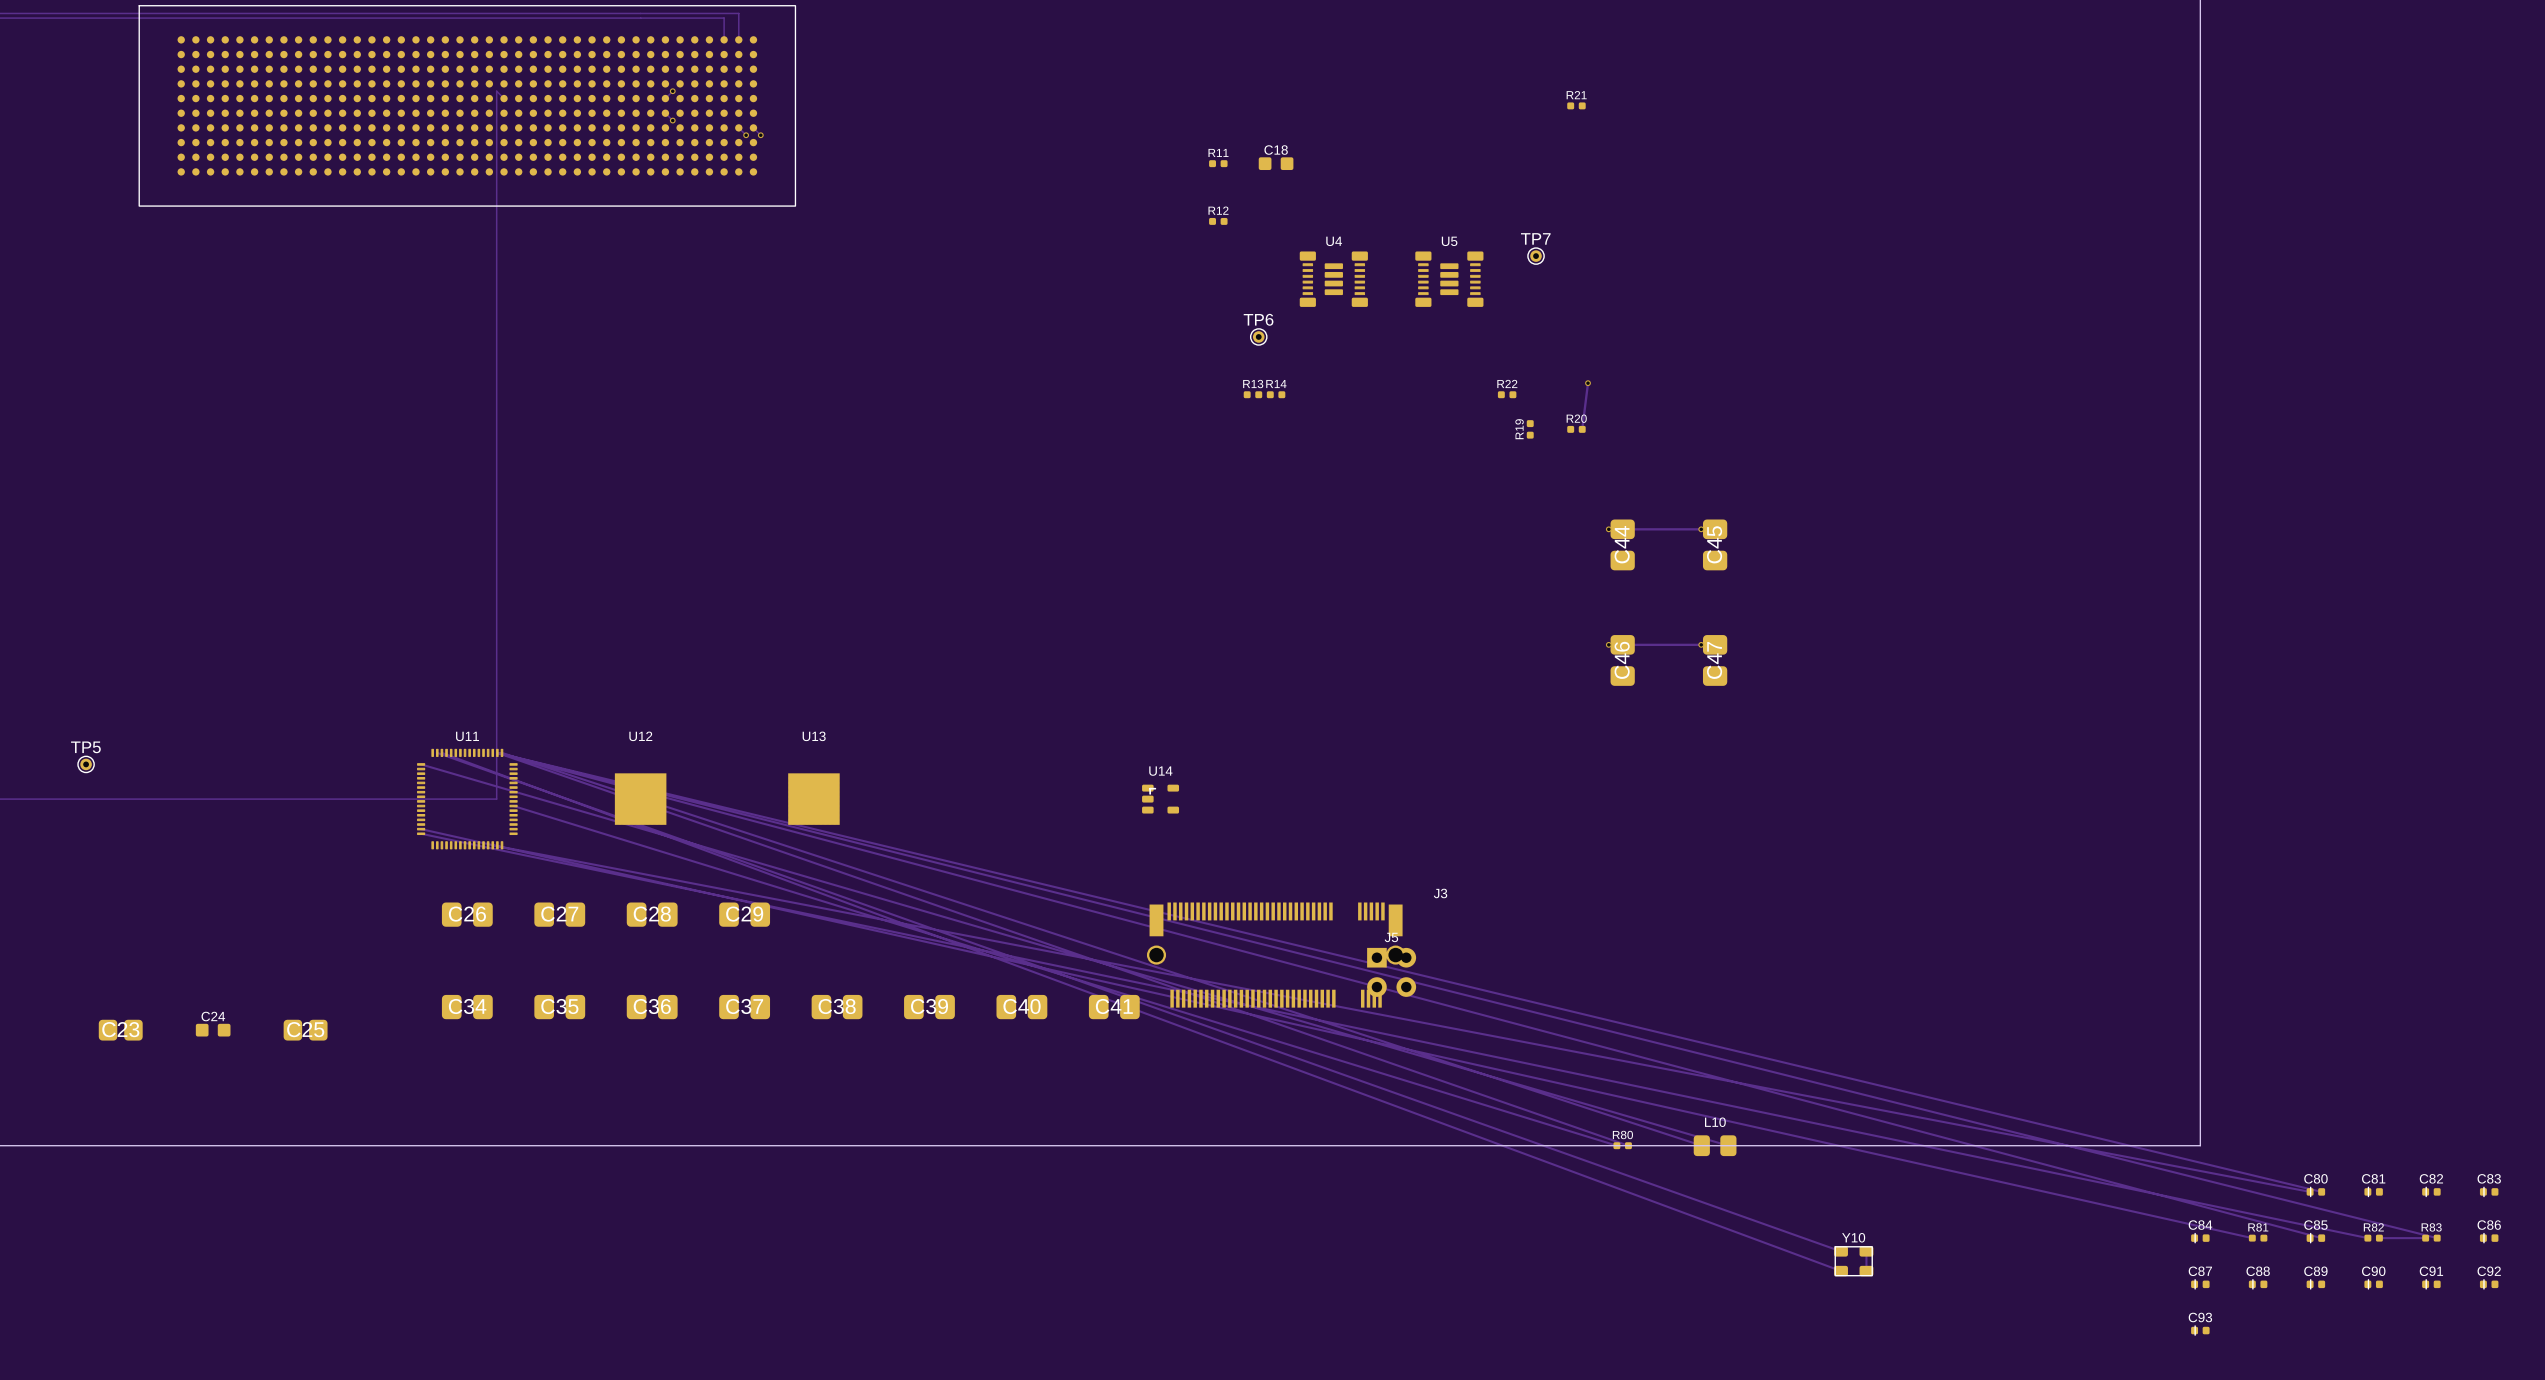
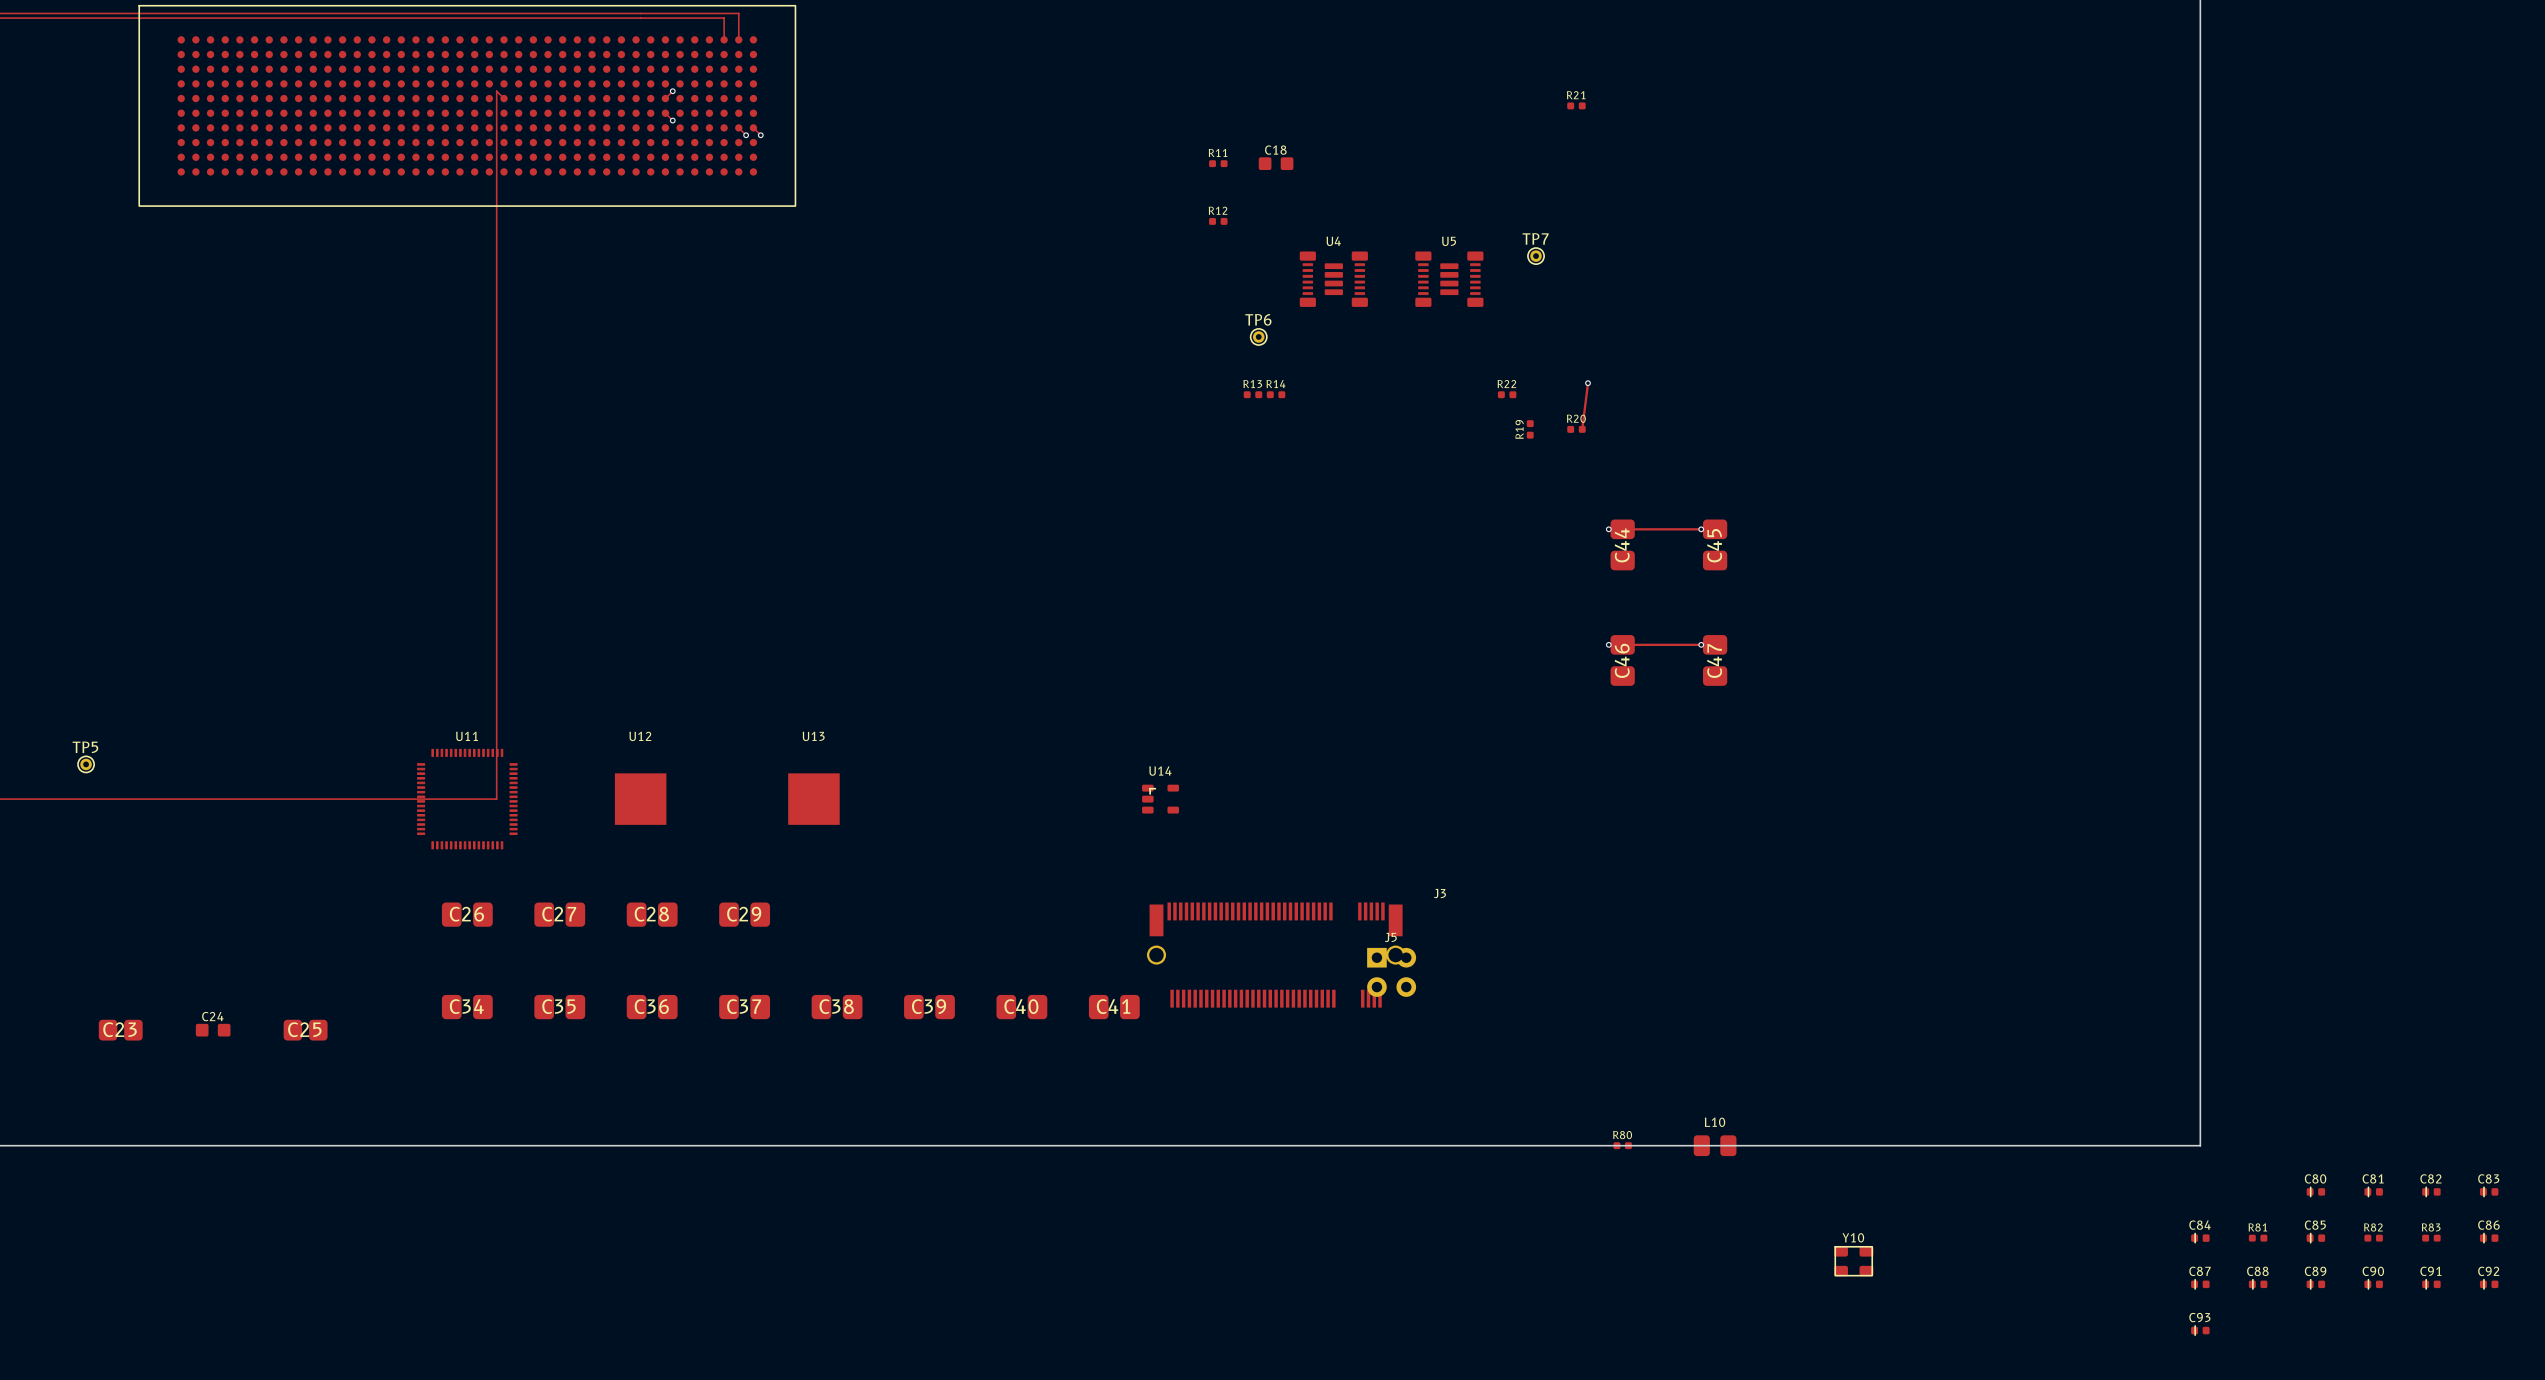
track: (437, 752) (1841, 1251) -> none
track: (441, 752) (1841, 1271) -> none
track: (497, 752) (2321, 1191) -> none
track: (497, 752) (2321, 1238) -> none
track: (497, 752) (2437, 1238) -> none
track: (497, 752) (1628, 1145) -> none
track: (502, 752) (1701, 1145) -> none
track: (421, 764) (1728, 1145) -> none
track: (513, 806) (1616, 1145) -> none
track: (421, 829) (2252, 1238) -> none
track: (421, 833) (2367, 1238) -> none
track: (492, 845) (2310, 1191) -> none
track: (2379, 1238) (2425, 1238) -> none
track: (1866, 1251) (1866, 1271) -> none

